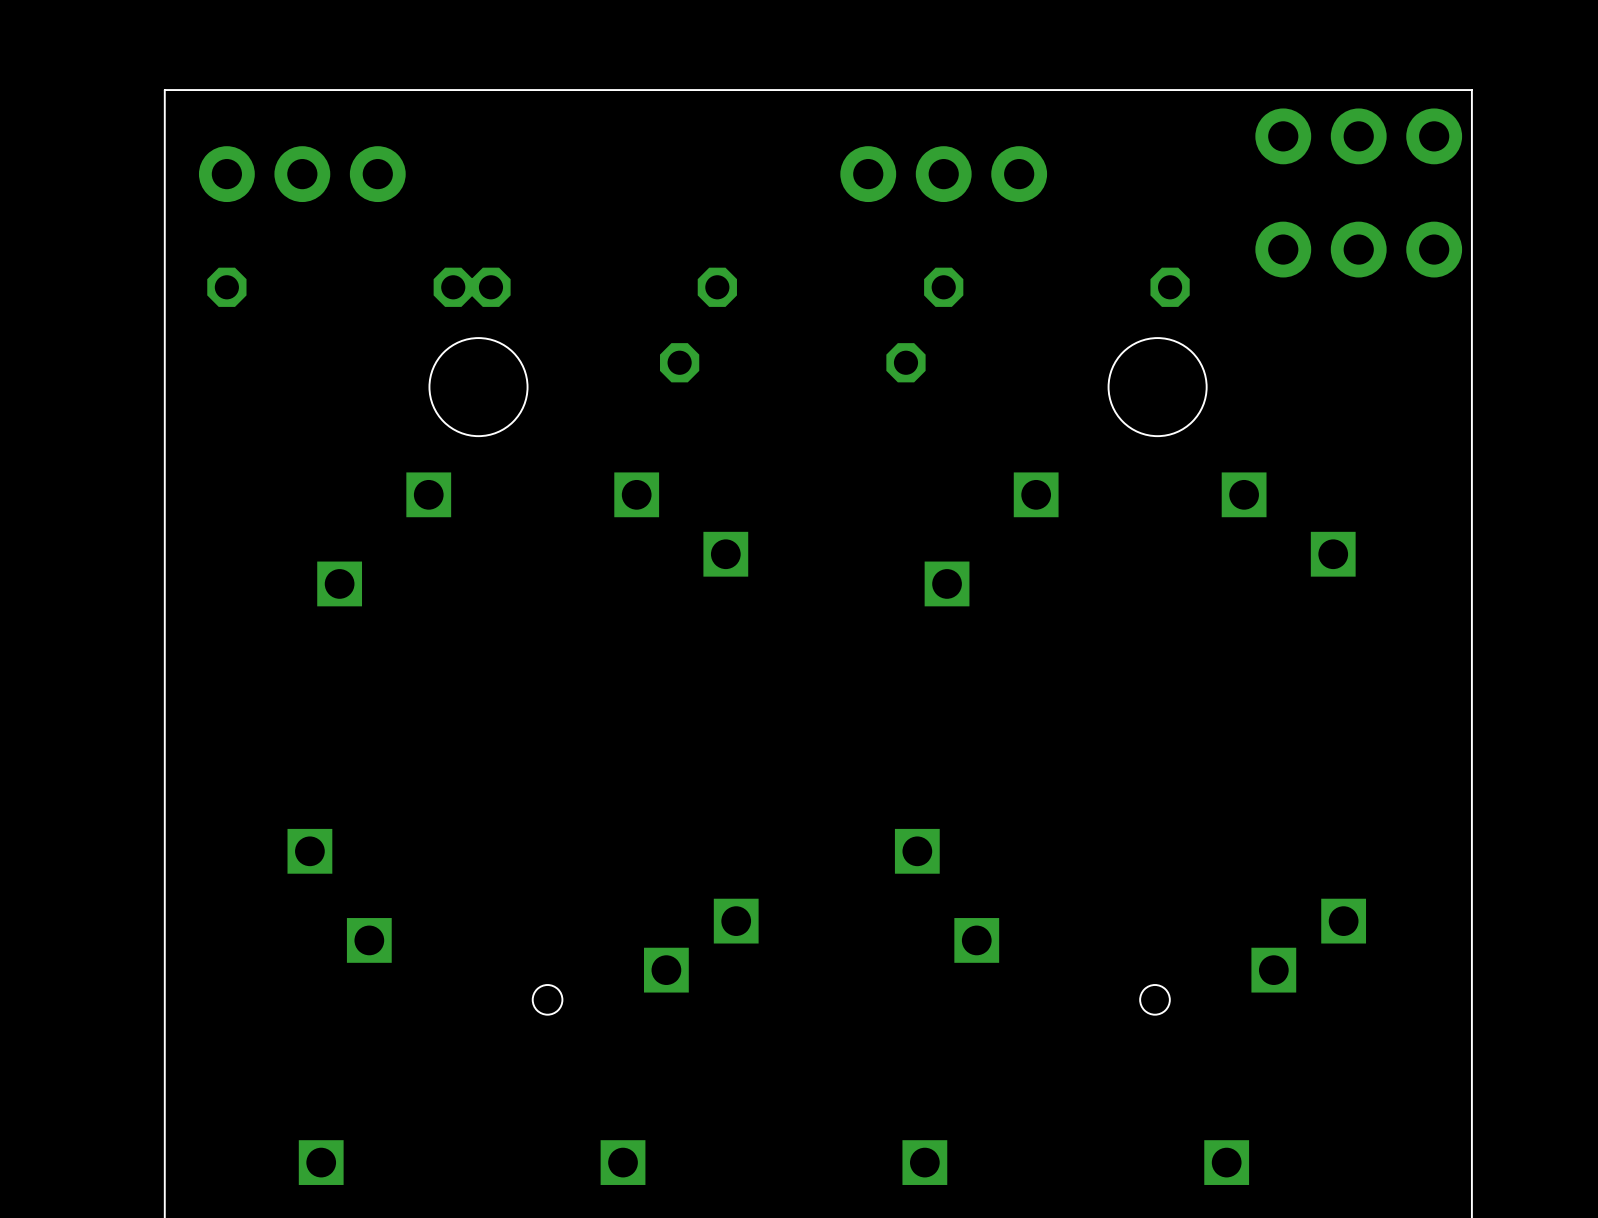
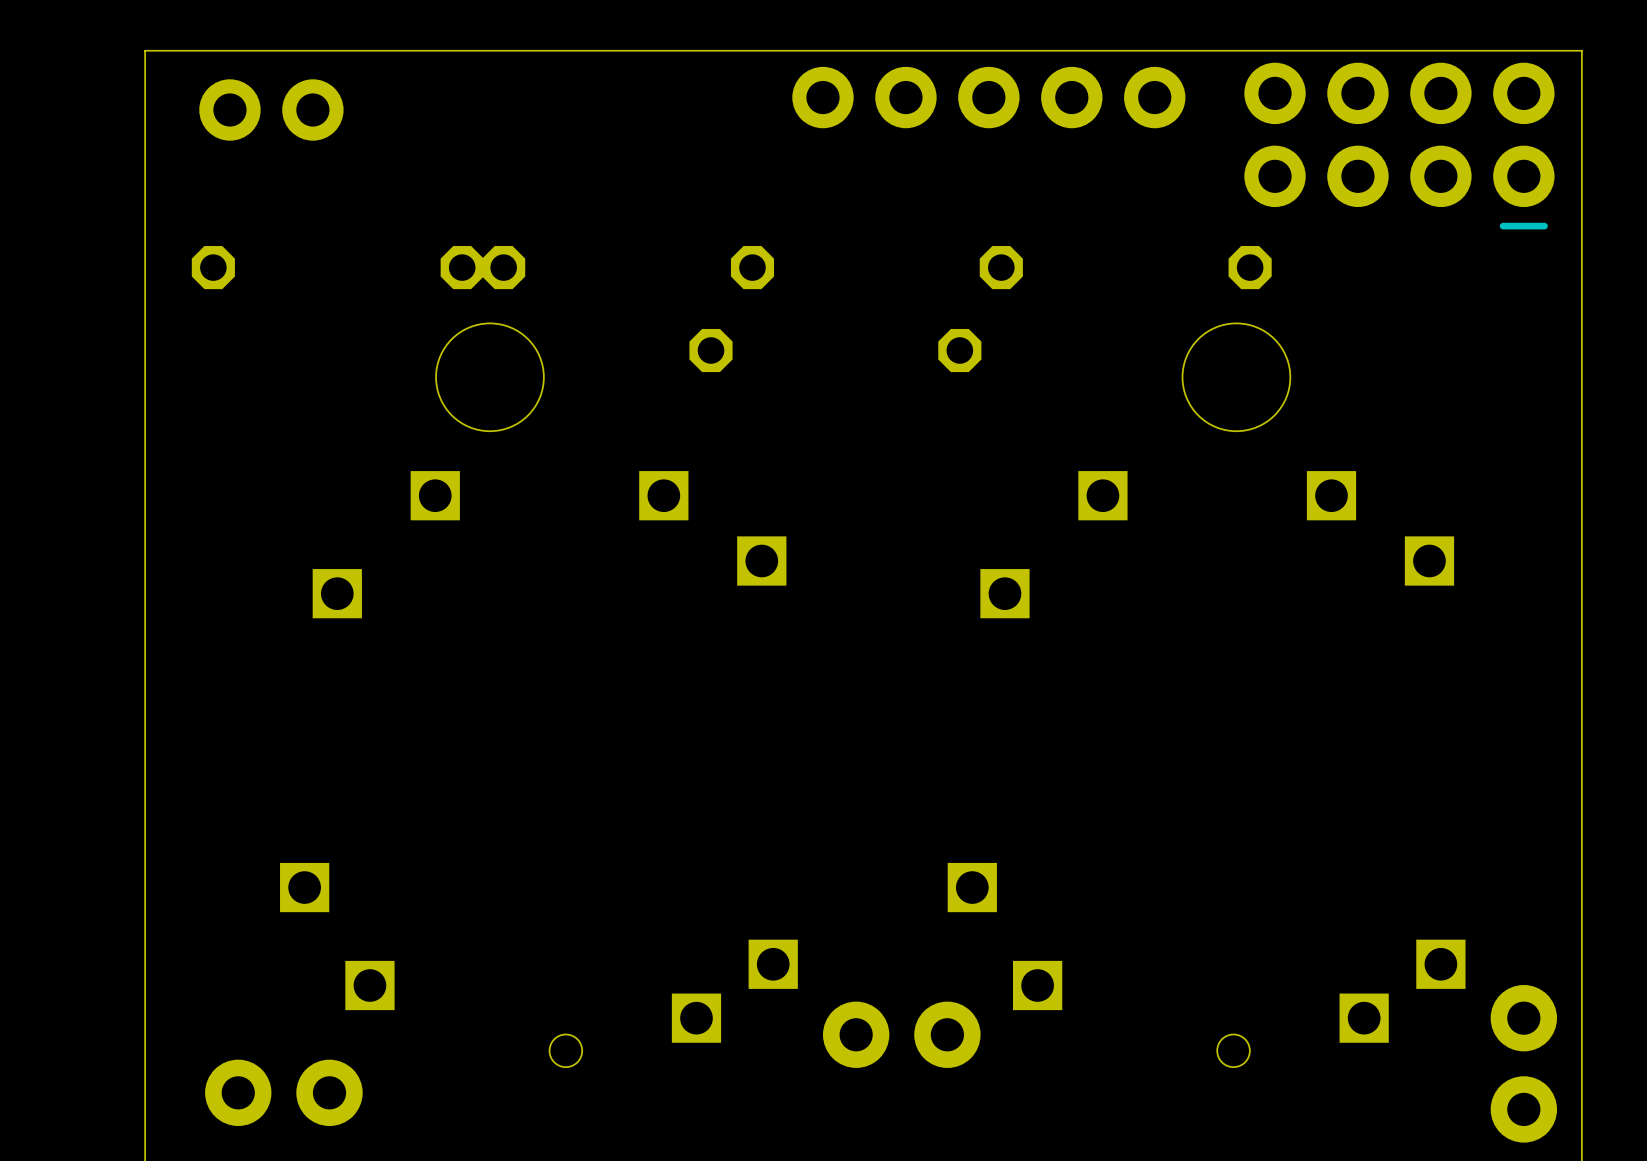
part: none -> (988, 97)
part: (1358, 136) -> none
part: none -> (271, 109)
part: (302, 174) -> none
part: (943, 174) -> none
part: none -> (1399, 146)
part: (1358, 249) -> none
part: none -> (901, 1034)
part: none -> (1523, 1063)
part: none -> (283, 1092)

